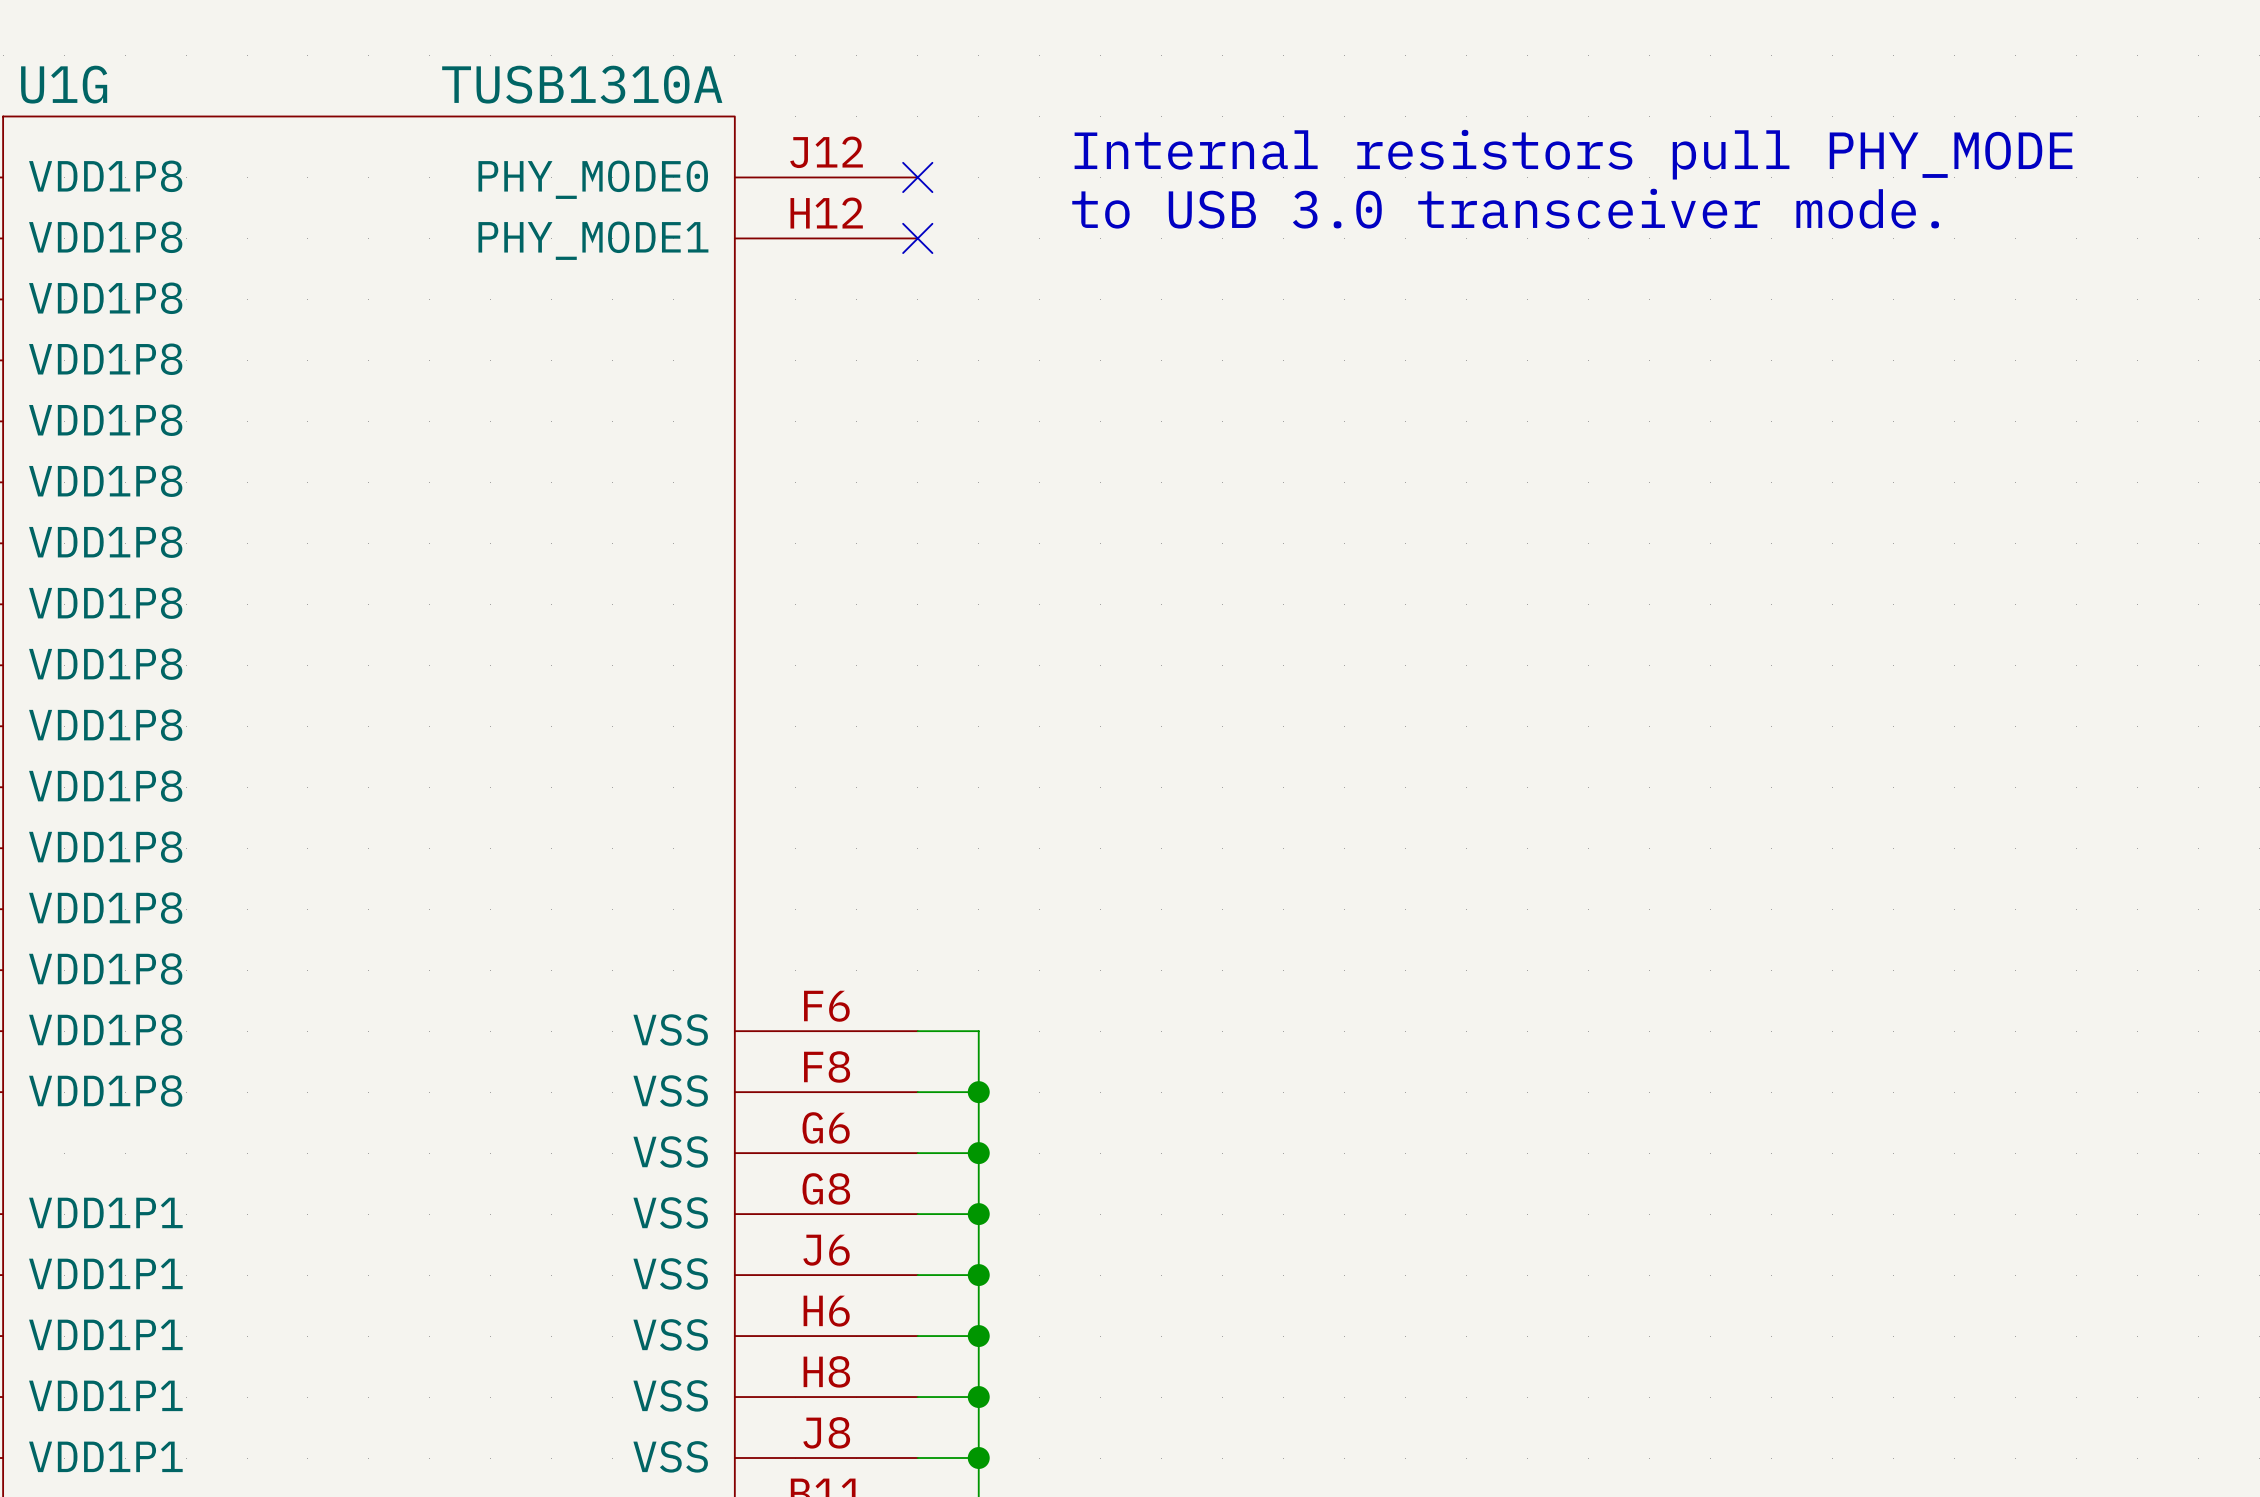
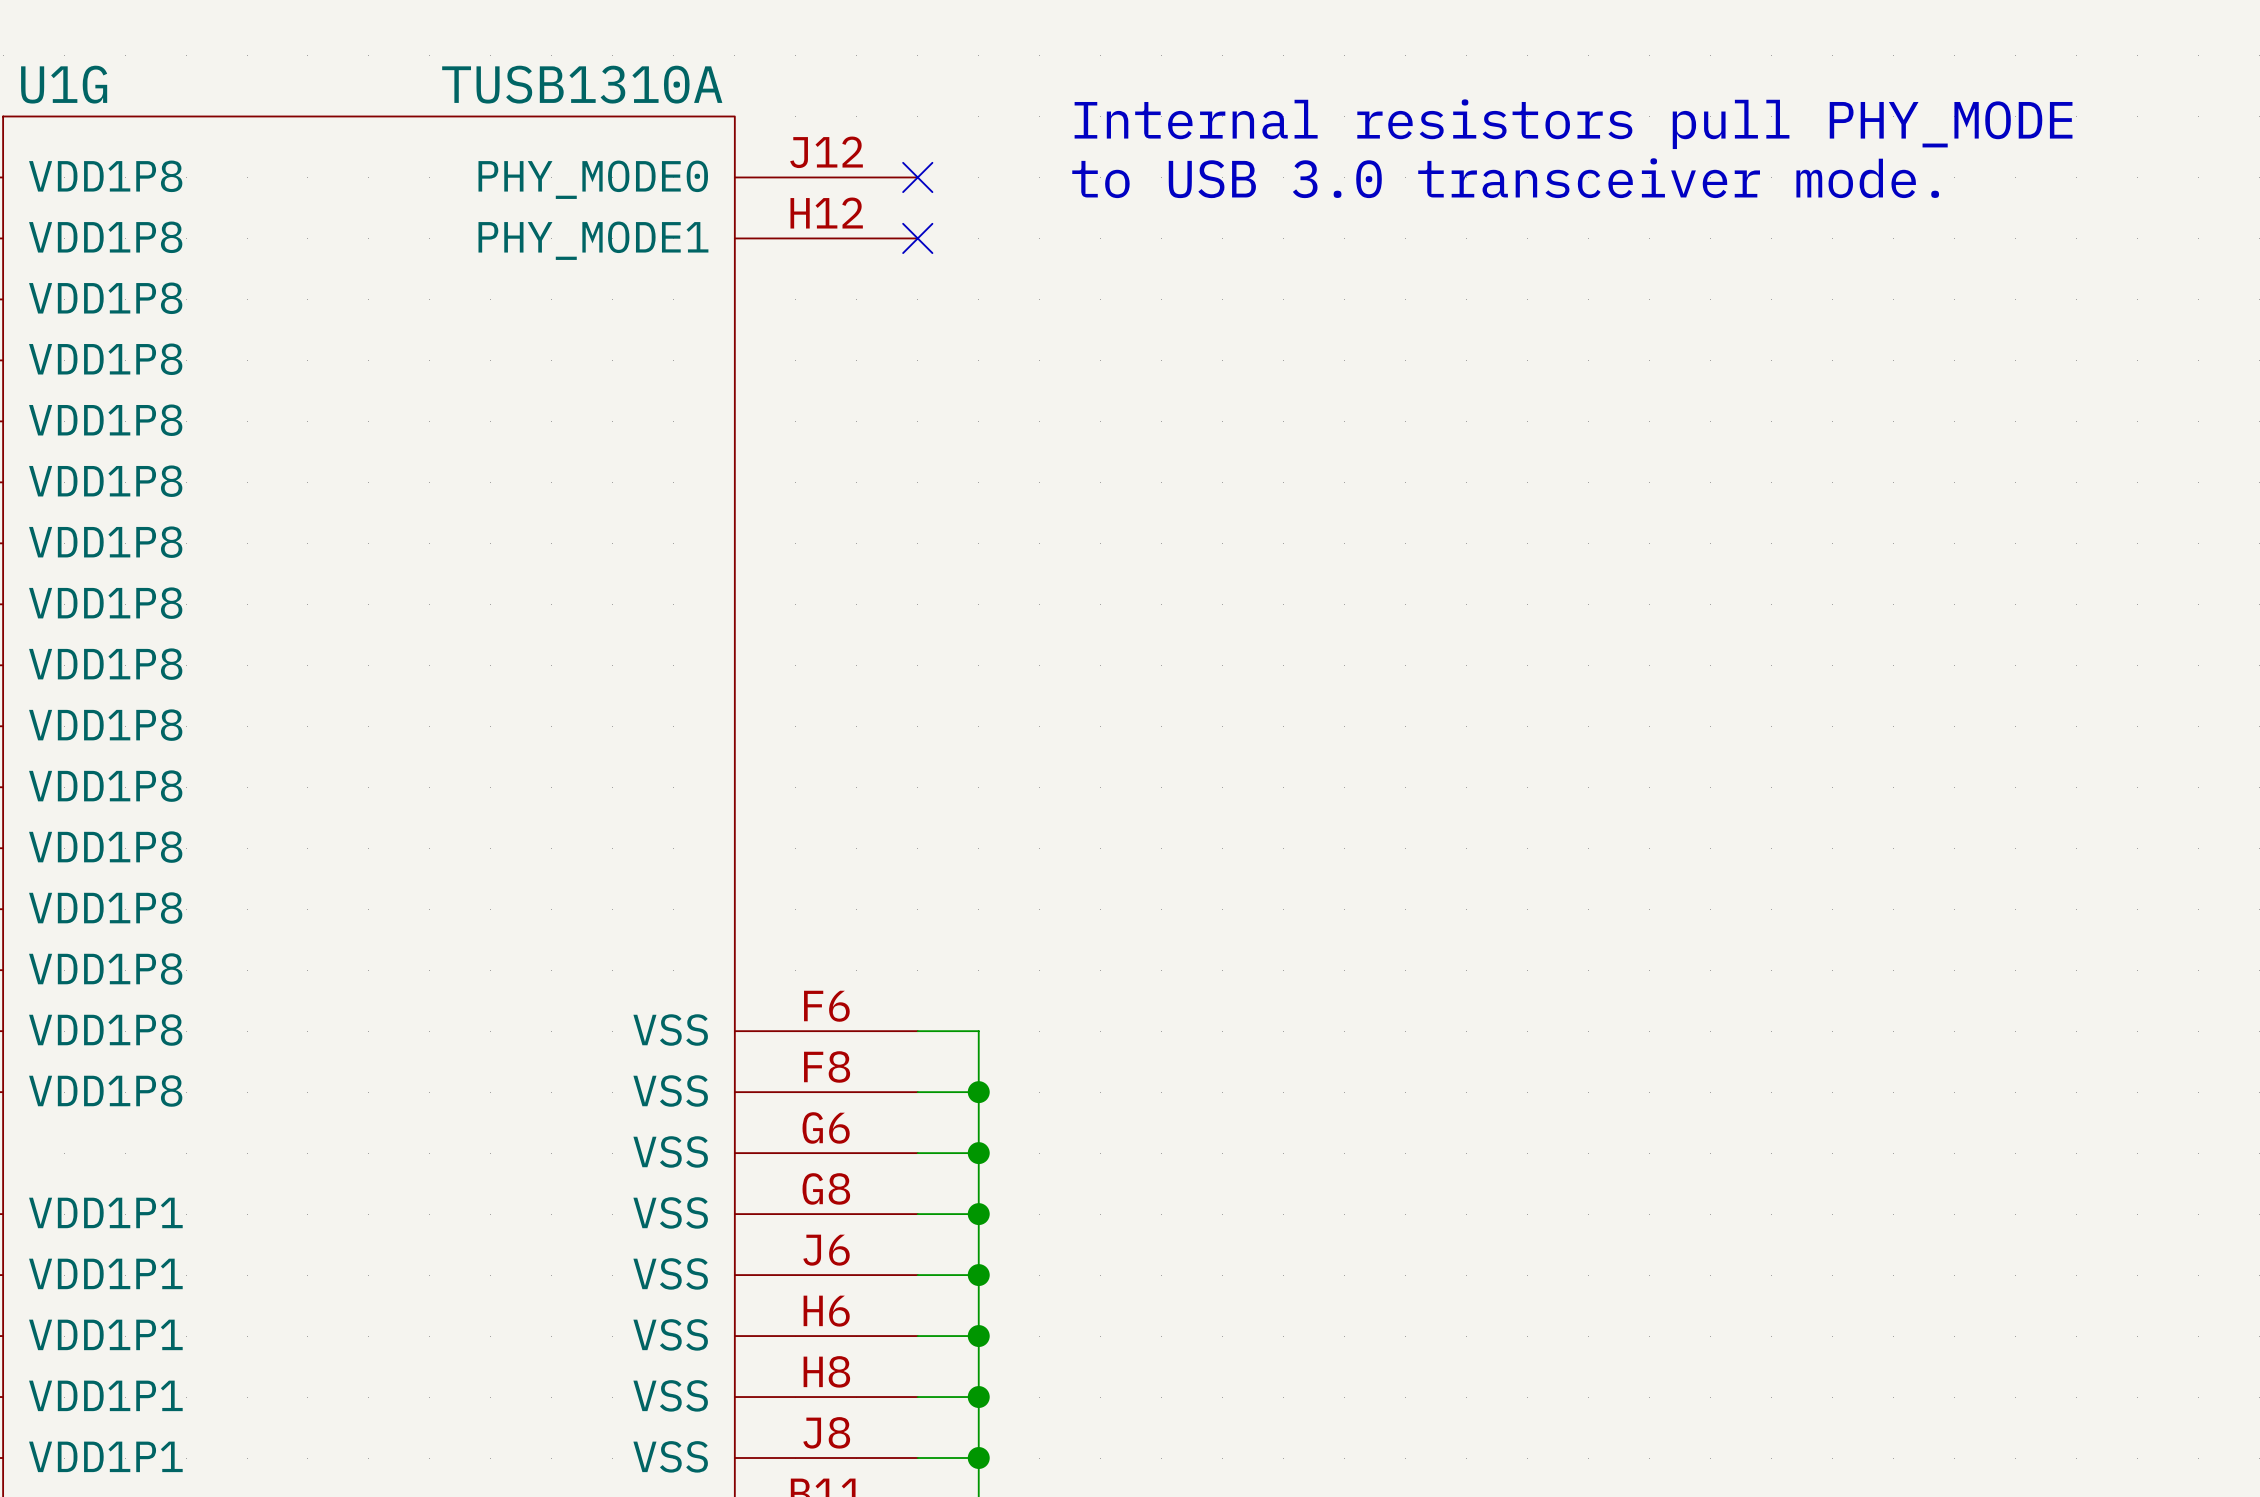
text position: Internal resistors pull PHY_MODE (1573, 154) -> Internal resistors pull PHY_MODE (1573, 124)
text position: to USB 3.0 transceiver mode. (1505, 208) -> to USB 3.0 transceiver mode. (1505, 178)

